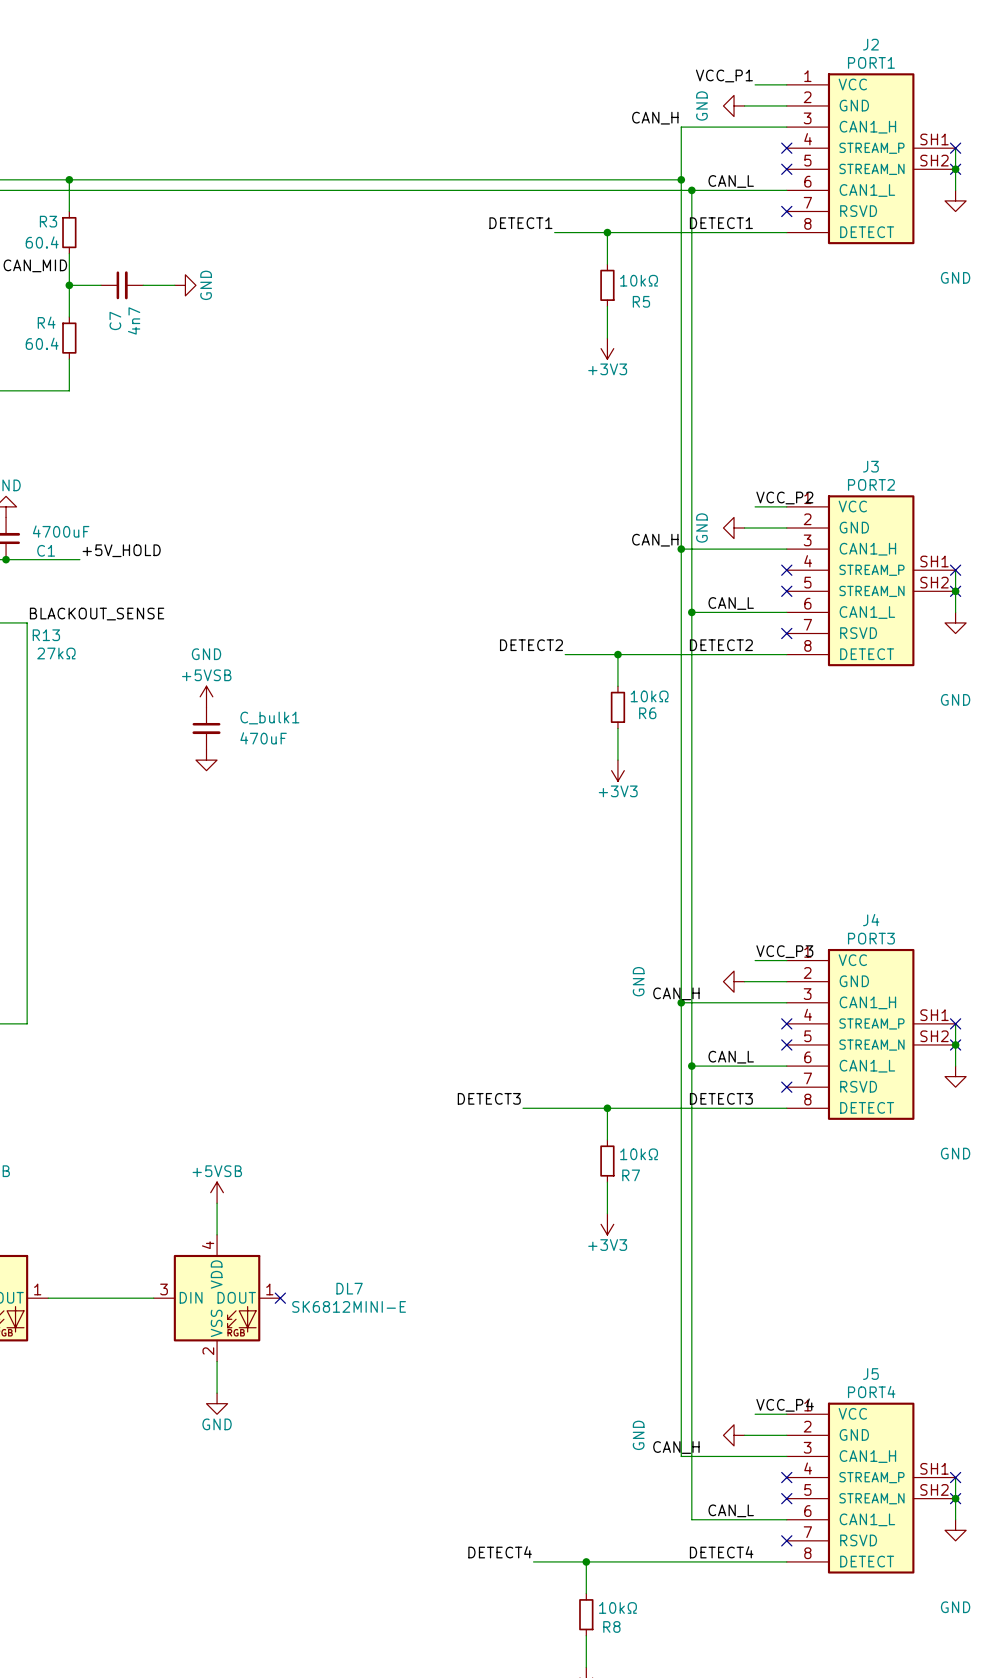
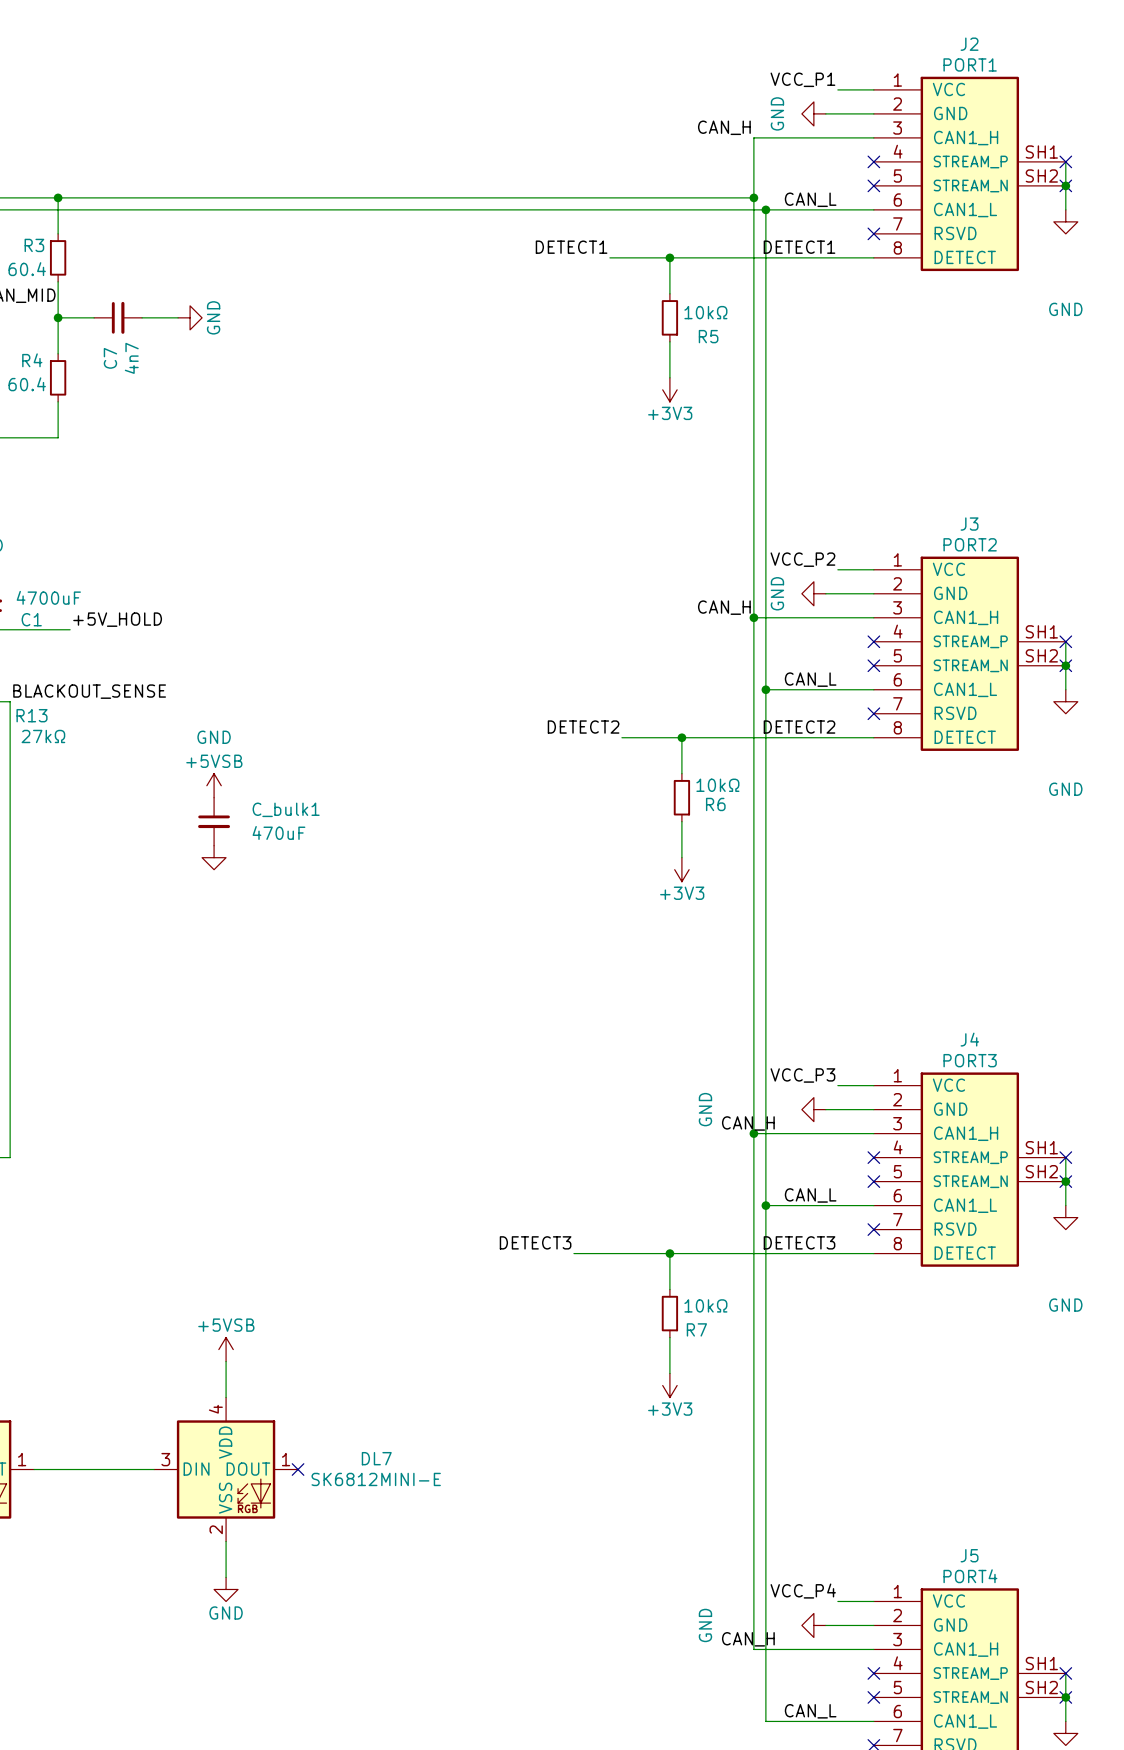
label position: VCC_P2 (784, 497) -> VCC_P2 (802, 559)
label position: VCC_P3 (784, 951) -> VCC_P3 (802, 1075)
label position: VCC_P4 (785, 1405) -> VCC_P4 (803, 1591)

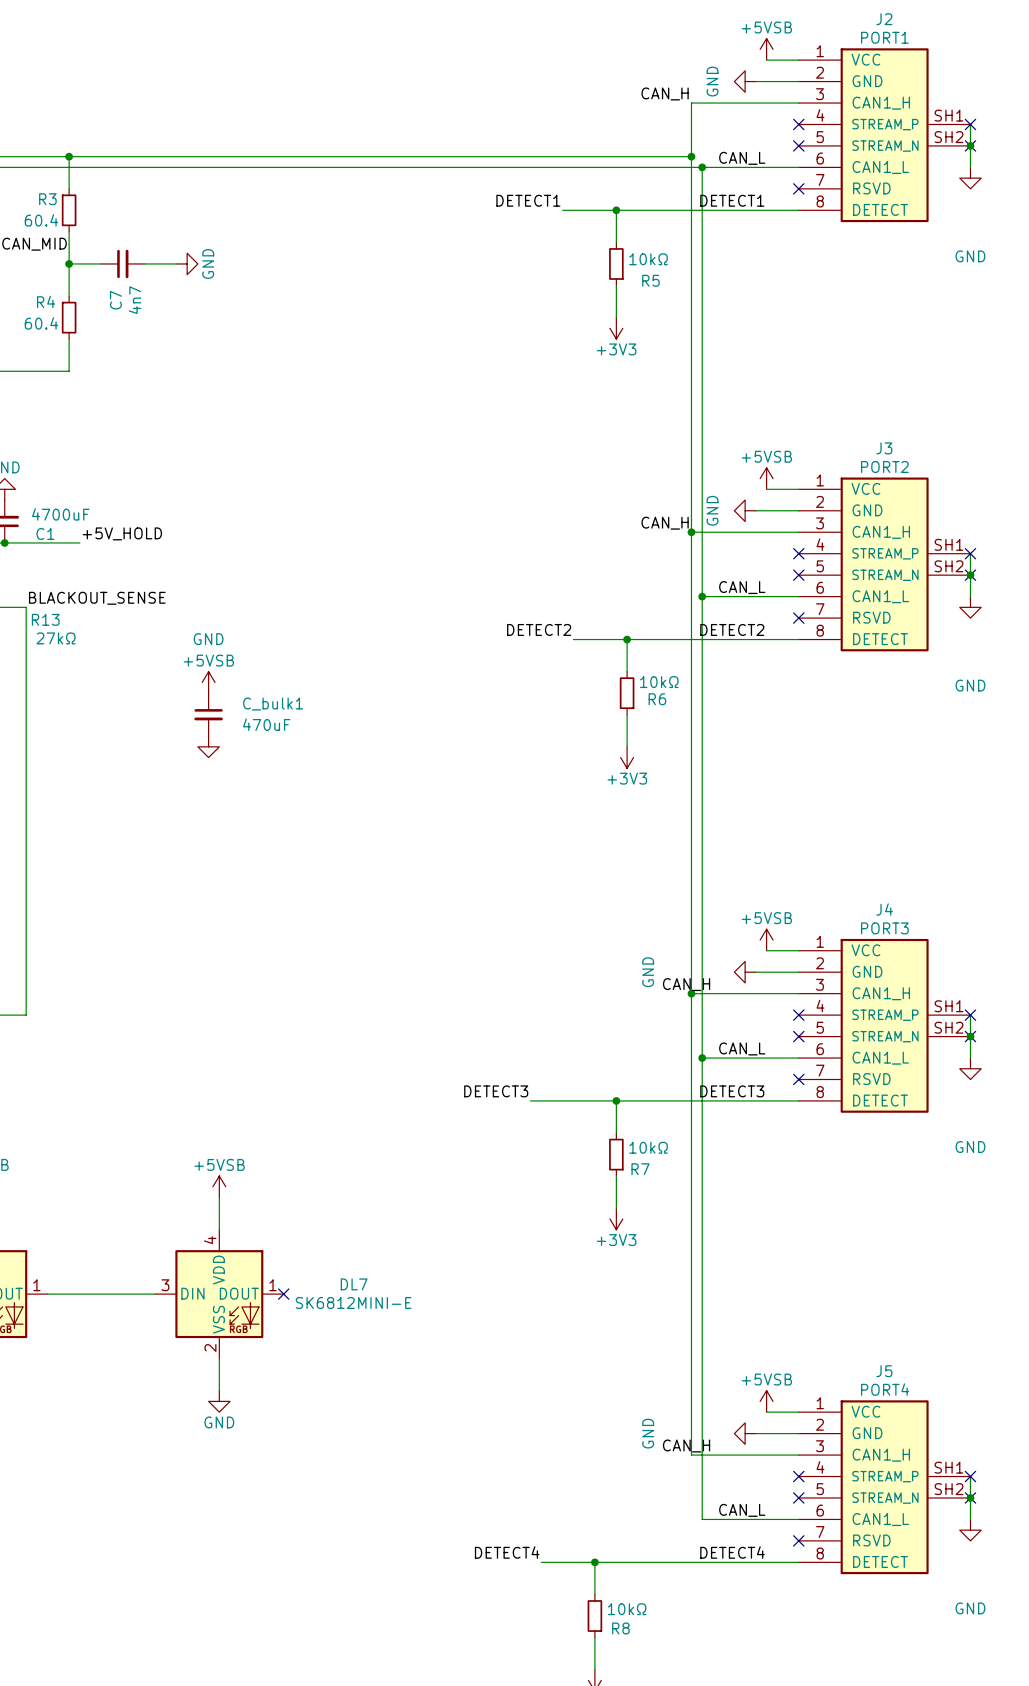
power symbol: none -> +5VSB (766, 49)
label: VCC_P1 (802, 79) -> none
power symbol: none -> +5VSB (766, 478)
label: VCC_P2 (802, 559) -> none
power symbol: none -> +5VSB (766, 939)
label: VCC_P3 (802, 1075) -> none
power symbol: none -> +5VSB (766, 1401)
label: VCC_P4 (803, 1591) -> none

